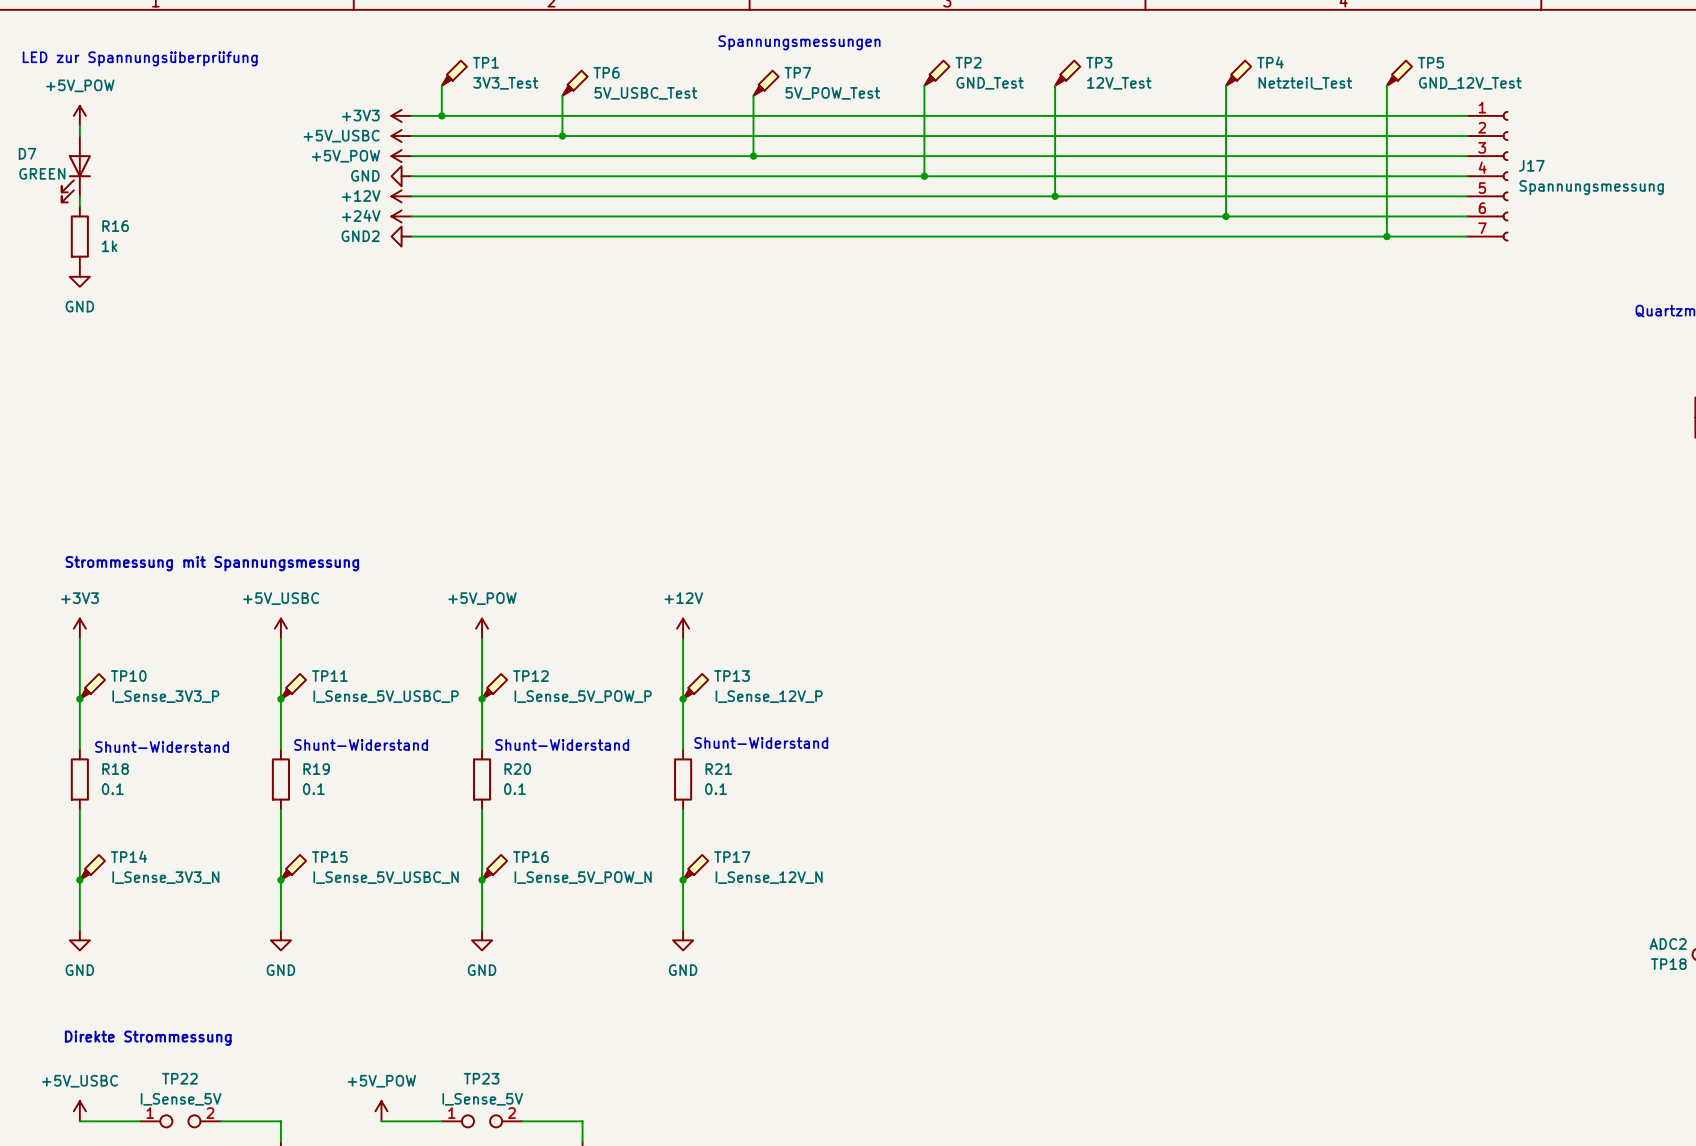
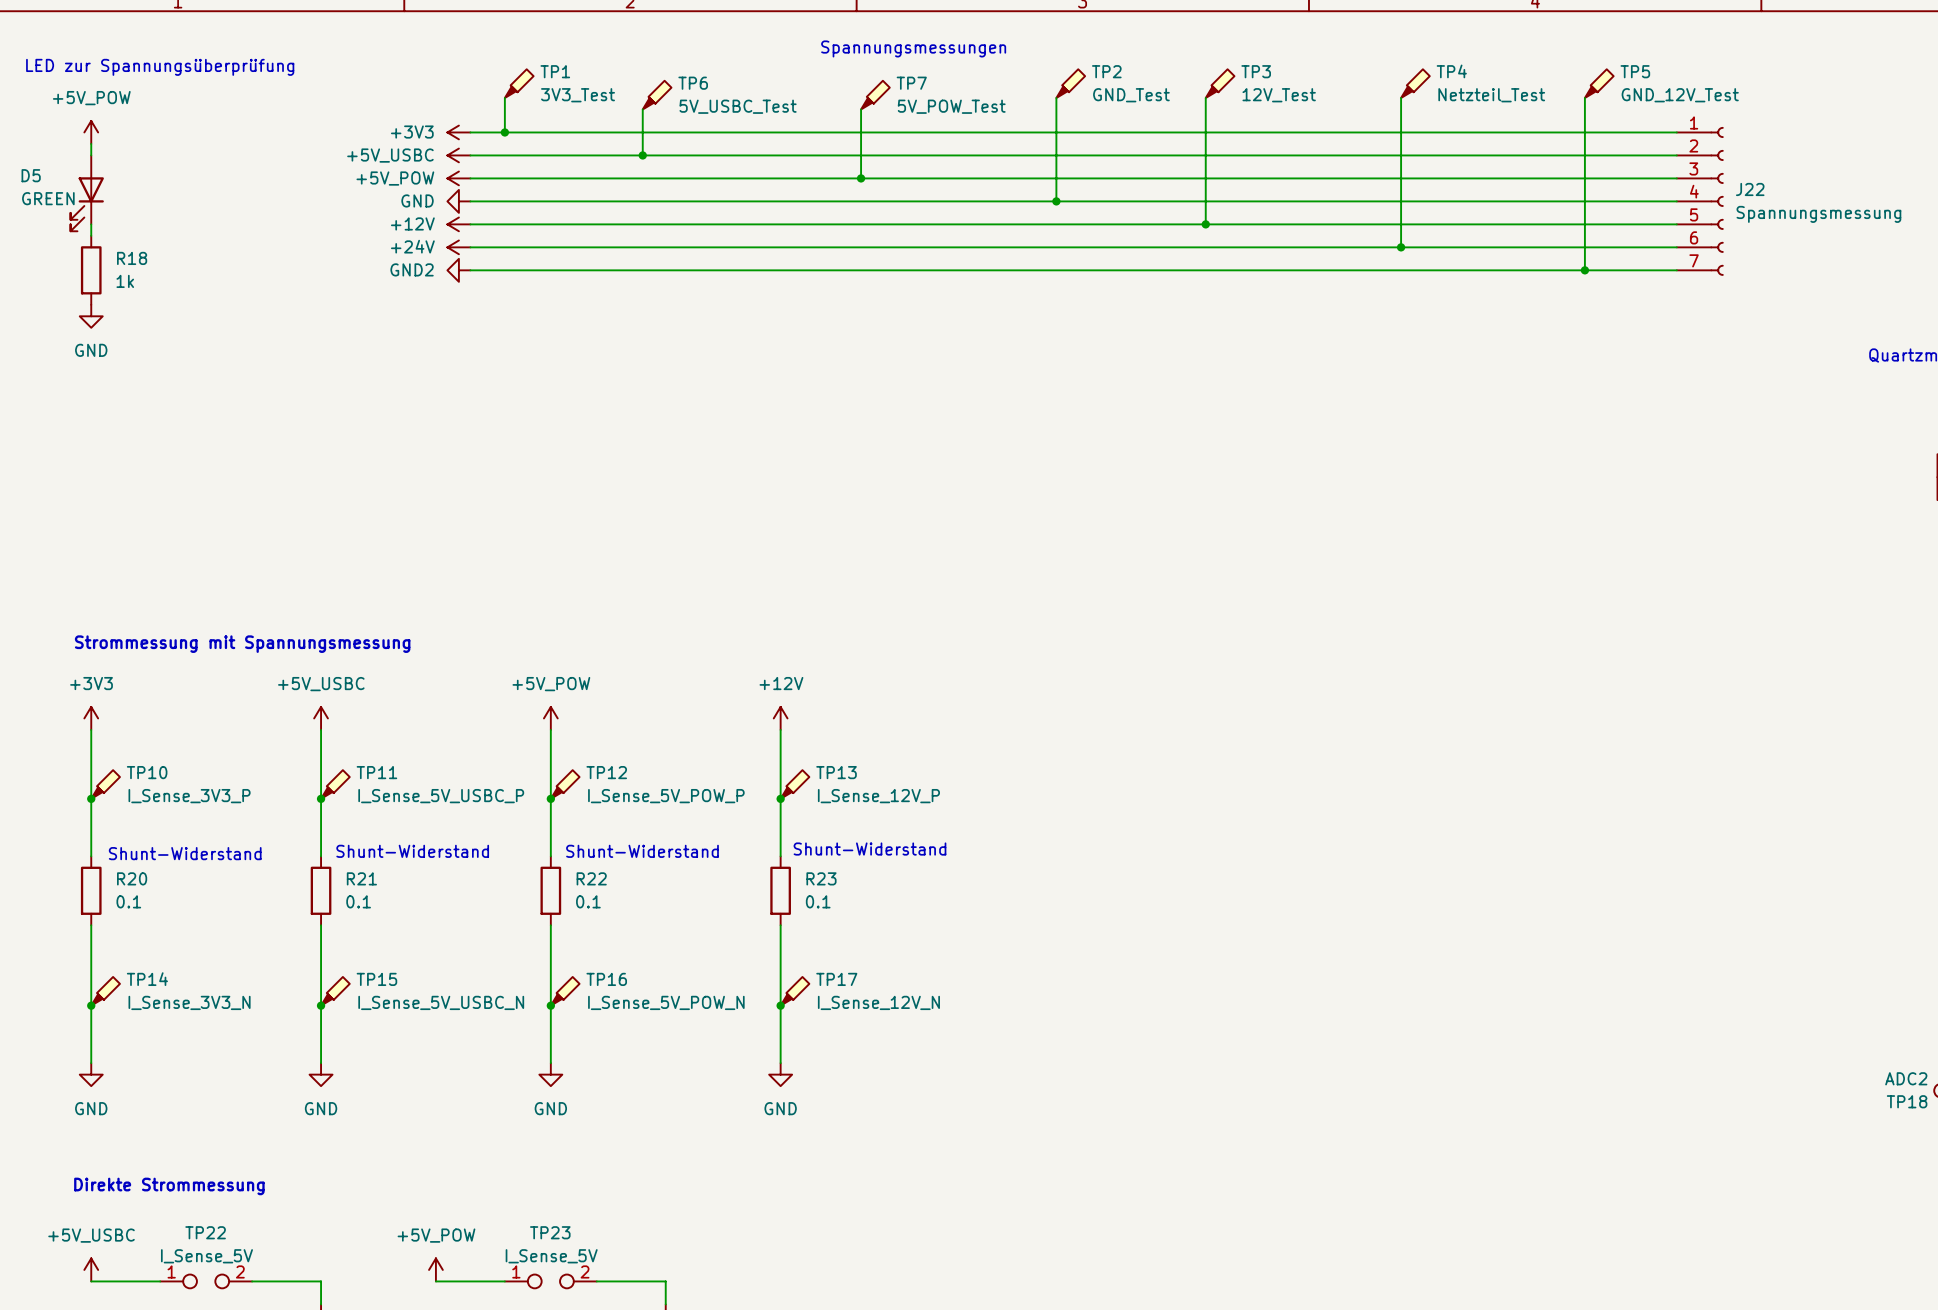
D7 name: D7 (27, 153) -> D5 (31, 175)
J17 name: J17 (1531, 165) -> J22 (1750, 189)
R16 name: R16 (115, 226) -> R18 (132, 258)
R18 name: R18 (115, 769) -> R20 (132, 878)
R19 name: R19 (316, 769) -> R21 (361, 878)
R20 name: R20 (517, 769) -> R22 (591, 878)
R21 name: R21 (718, 769) -> R23 (821, 878)

